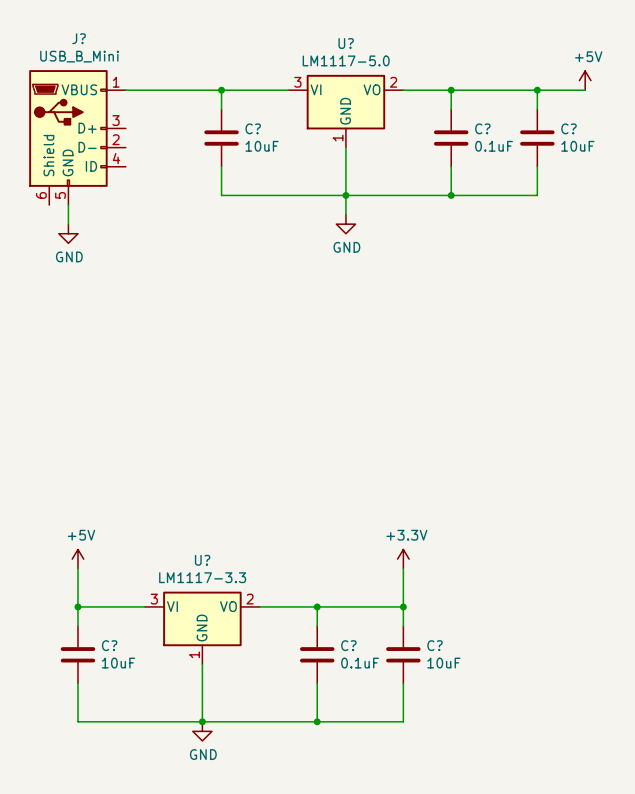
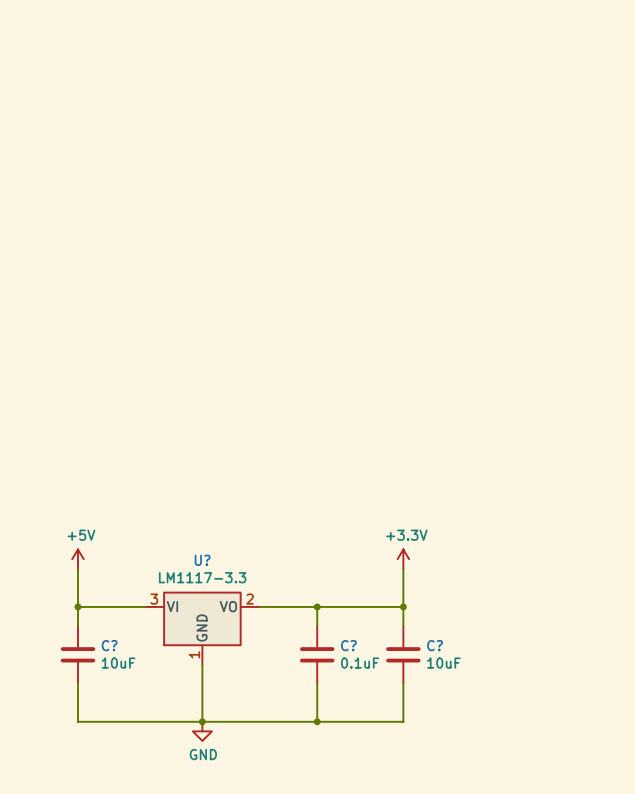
power symbol: +5V (585, 80) -> none
wire: (125, 90) (288, 90) -> none
wire: (221, 90) (221, 109) -> none
junction: (221, 90) -> none
wire: (403, 90) (585, 90) -> none
wire: (451, 90) (451, 109) -> none
junction: (451, 90) -> none
wire: (537, 90) (537, 109) -> none
junction: (537, 90) -> none
U?: LM1117-5.0 (345, 111) -> none
J?: USB_B_Mini (77, 137) -> none
C?: 10uF (221, 138) -> none
C?: 0.1uF (451, 138) -> none
C?: 10uF (537, 138) -> none
wire: (345, 147) (345, 214) -> none
wire: (221, 166) (221, 195) (537, 195) (537, 166) -> none
wire: (451, 166) (451, 195) -> none
junction: (345, 195) -> none
junction: (451, 195) -> none
wire: (68, 205) (68, 224) -> none
power symbol: GND (345, 224) -> none
power symbol: GND (68, 233) -> none

